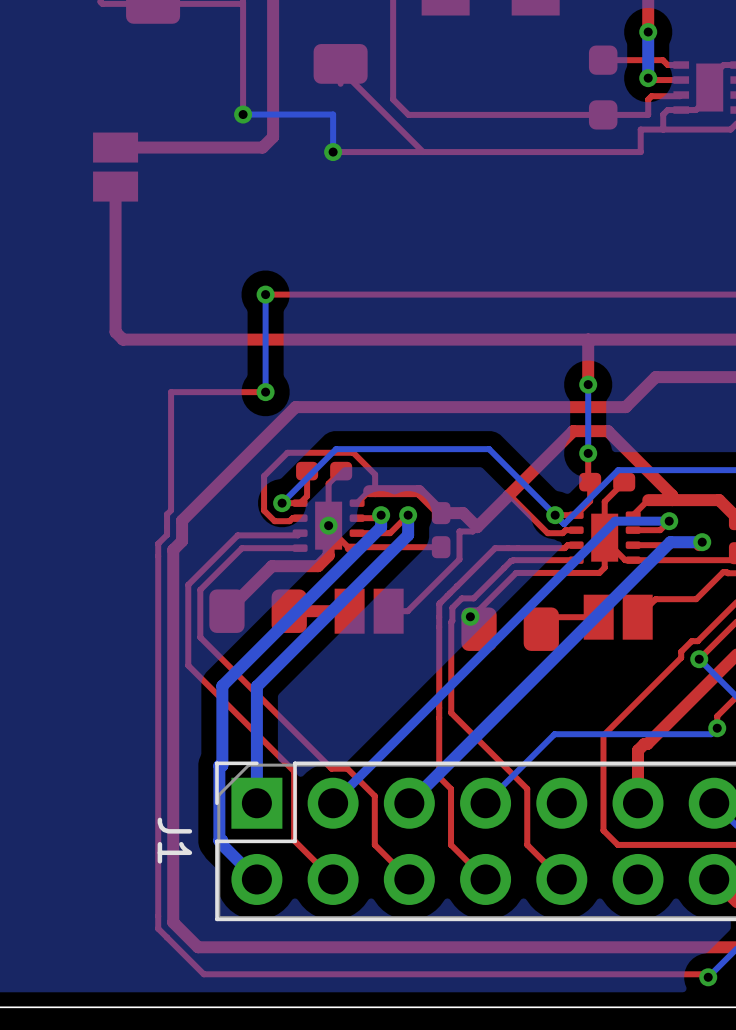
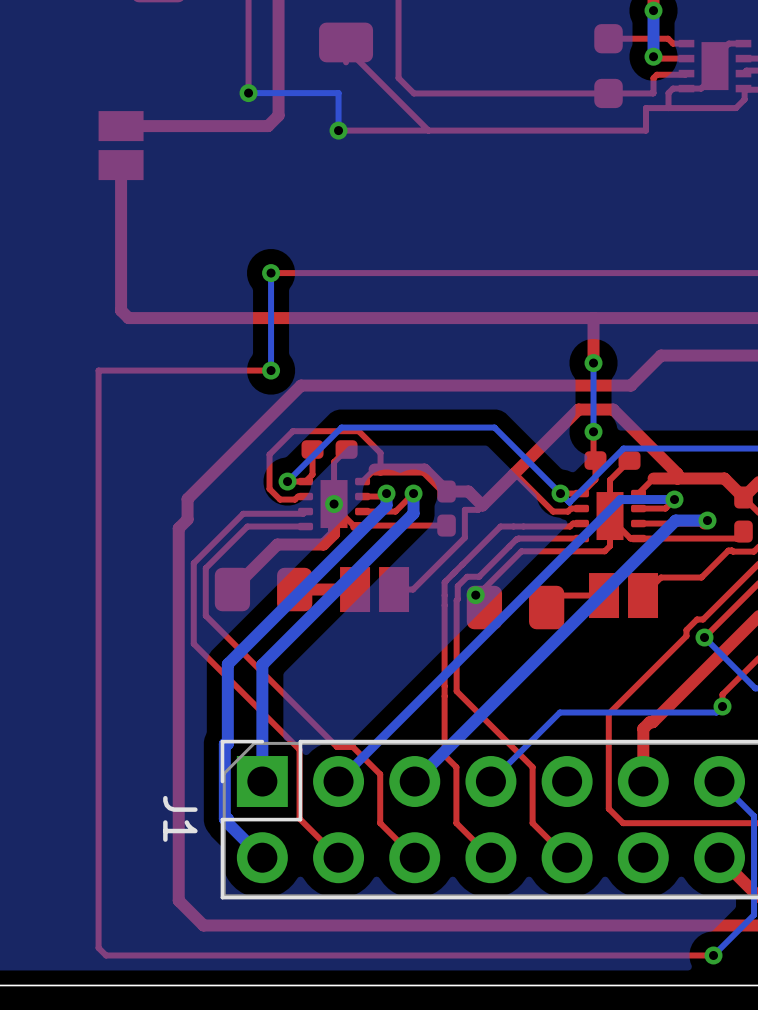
top track: (171, 392) (171, 510) (167, 514) (167, 534) (158, 543) (158, 928) (203, 974) (705, 974) (708, 977) -> (176, 370) (98, 370) (98, 947) (106, 955) (713, 955)

